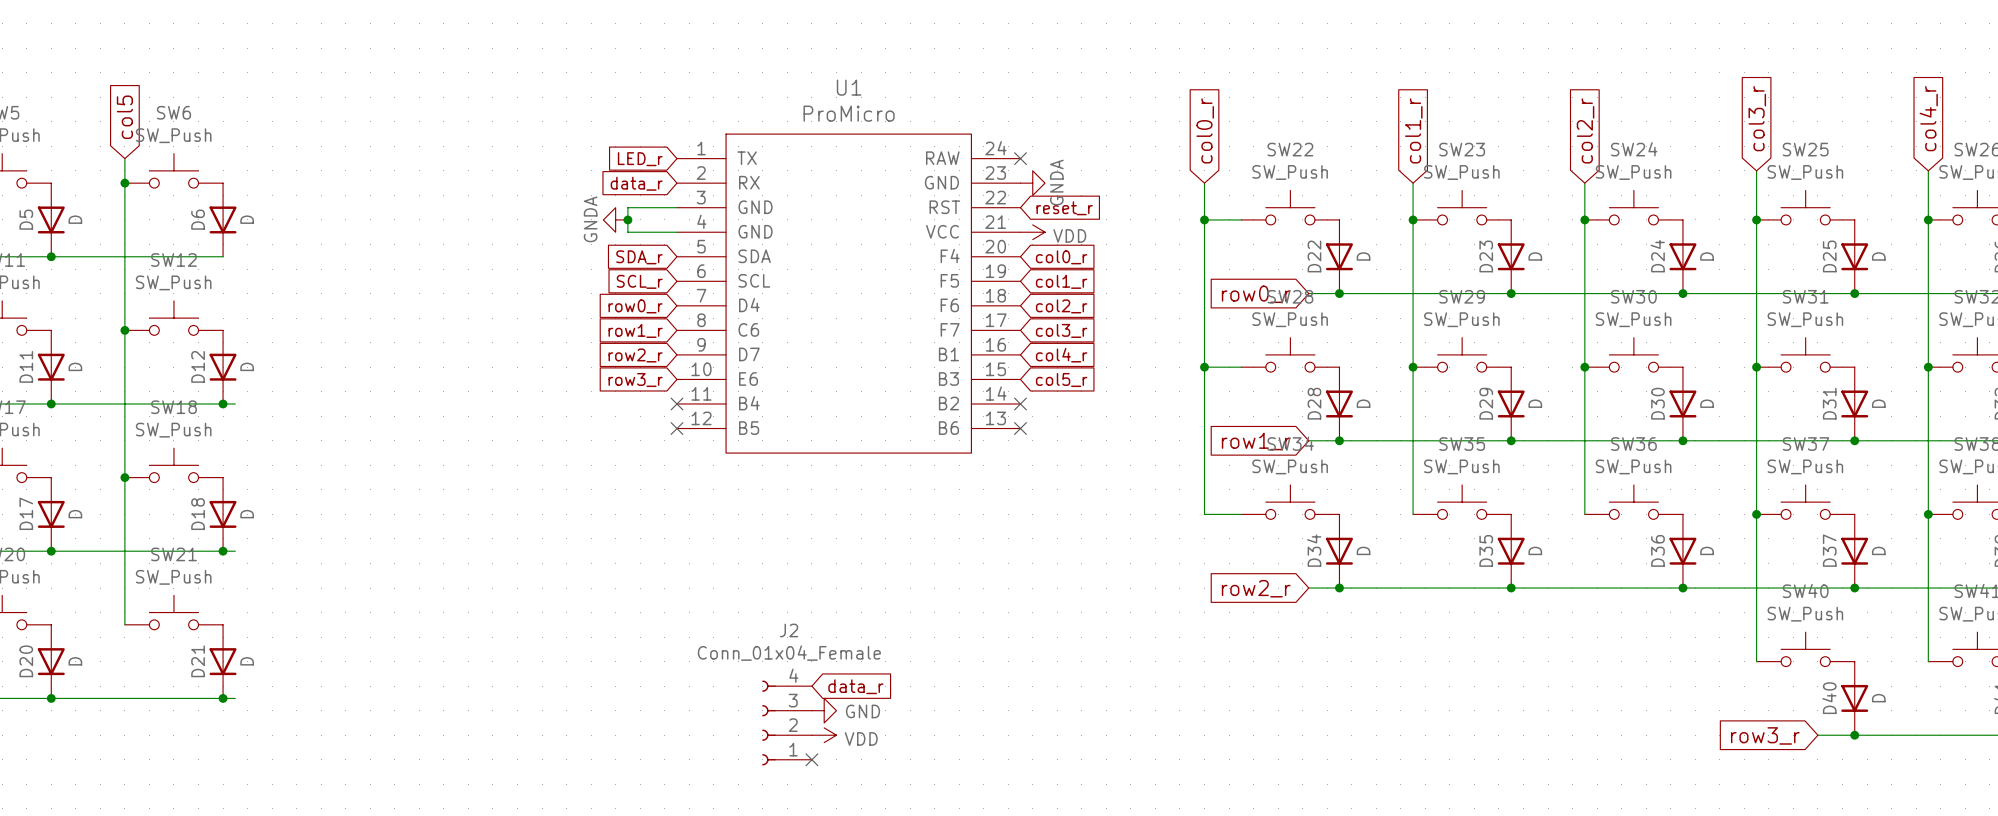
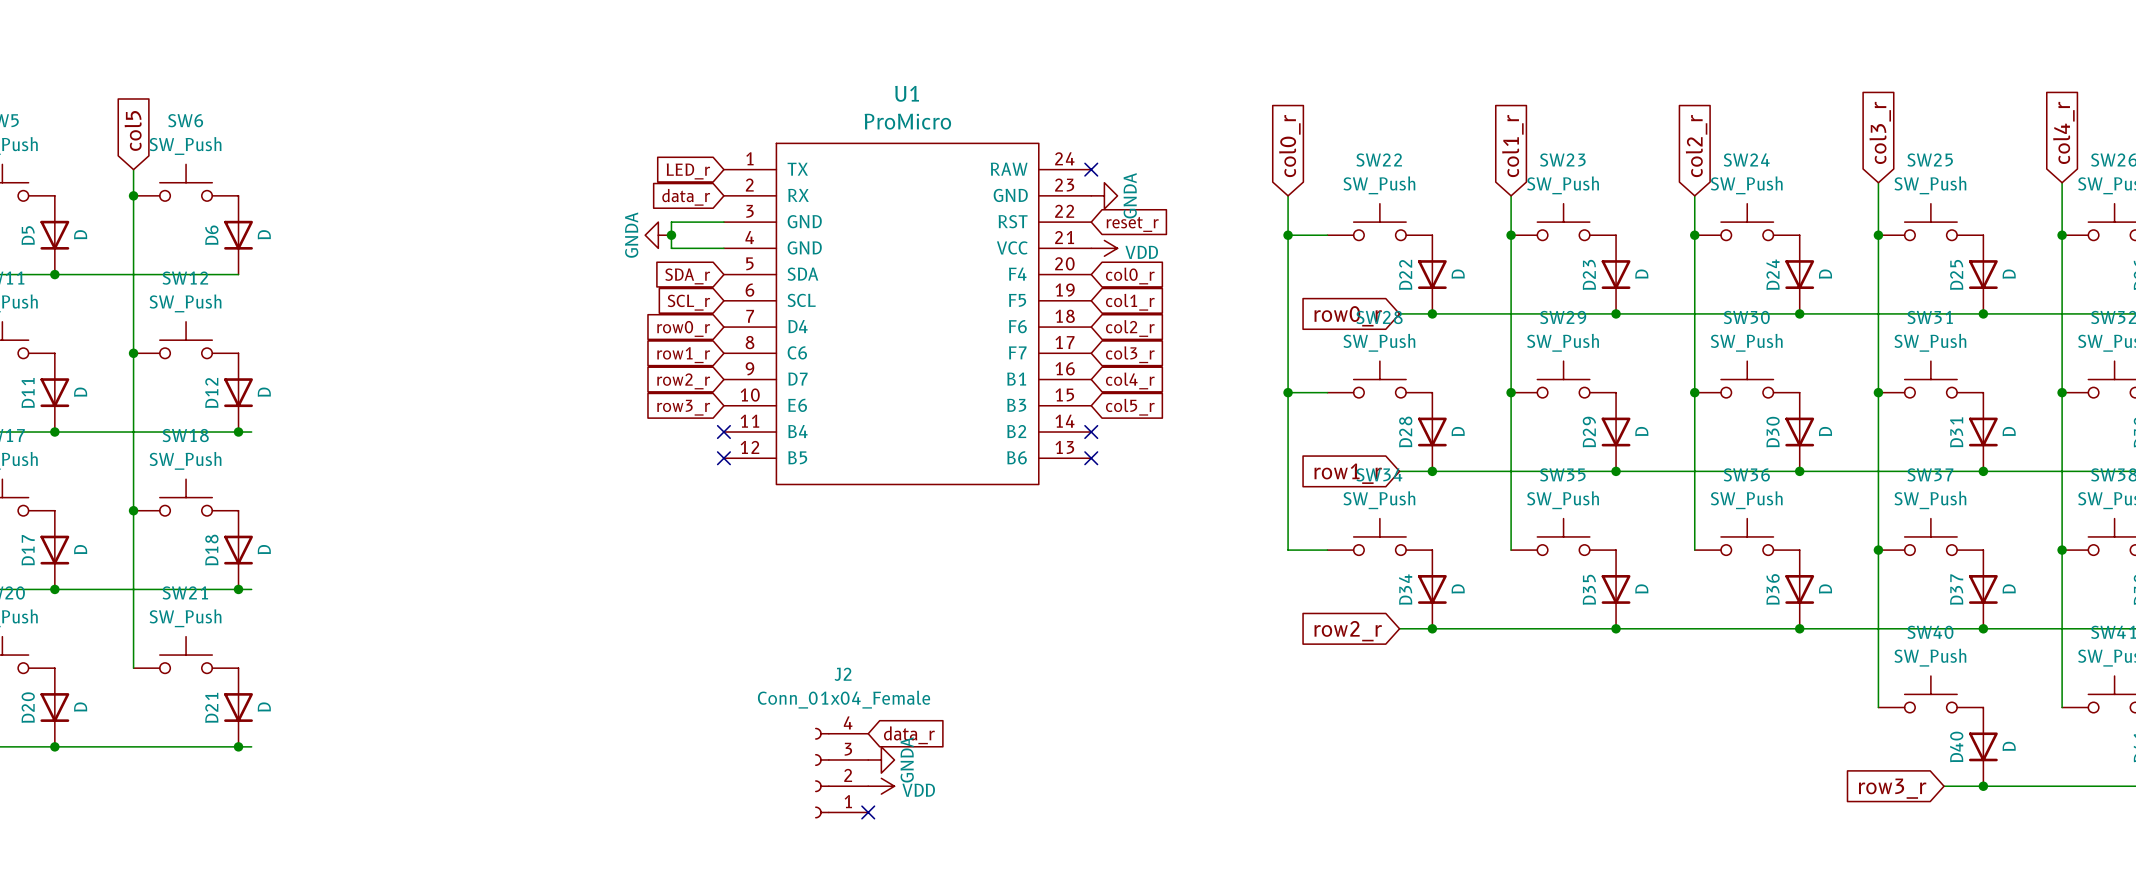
power symbol: GND (824, 710) -> GNDA (881, 759)

